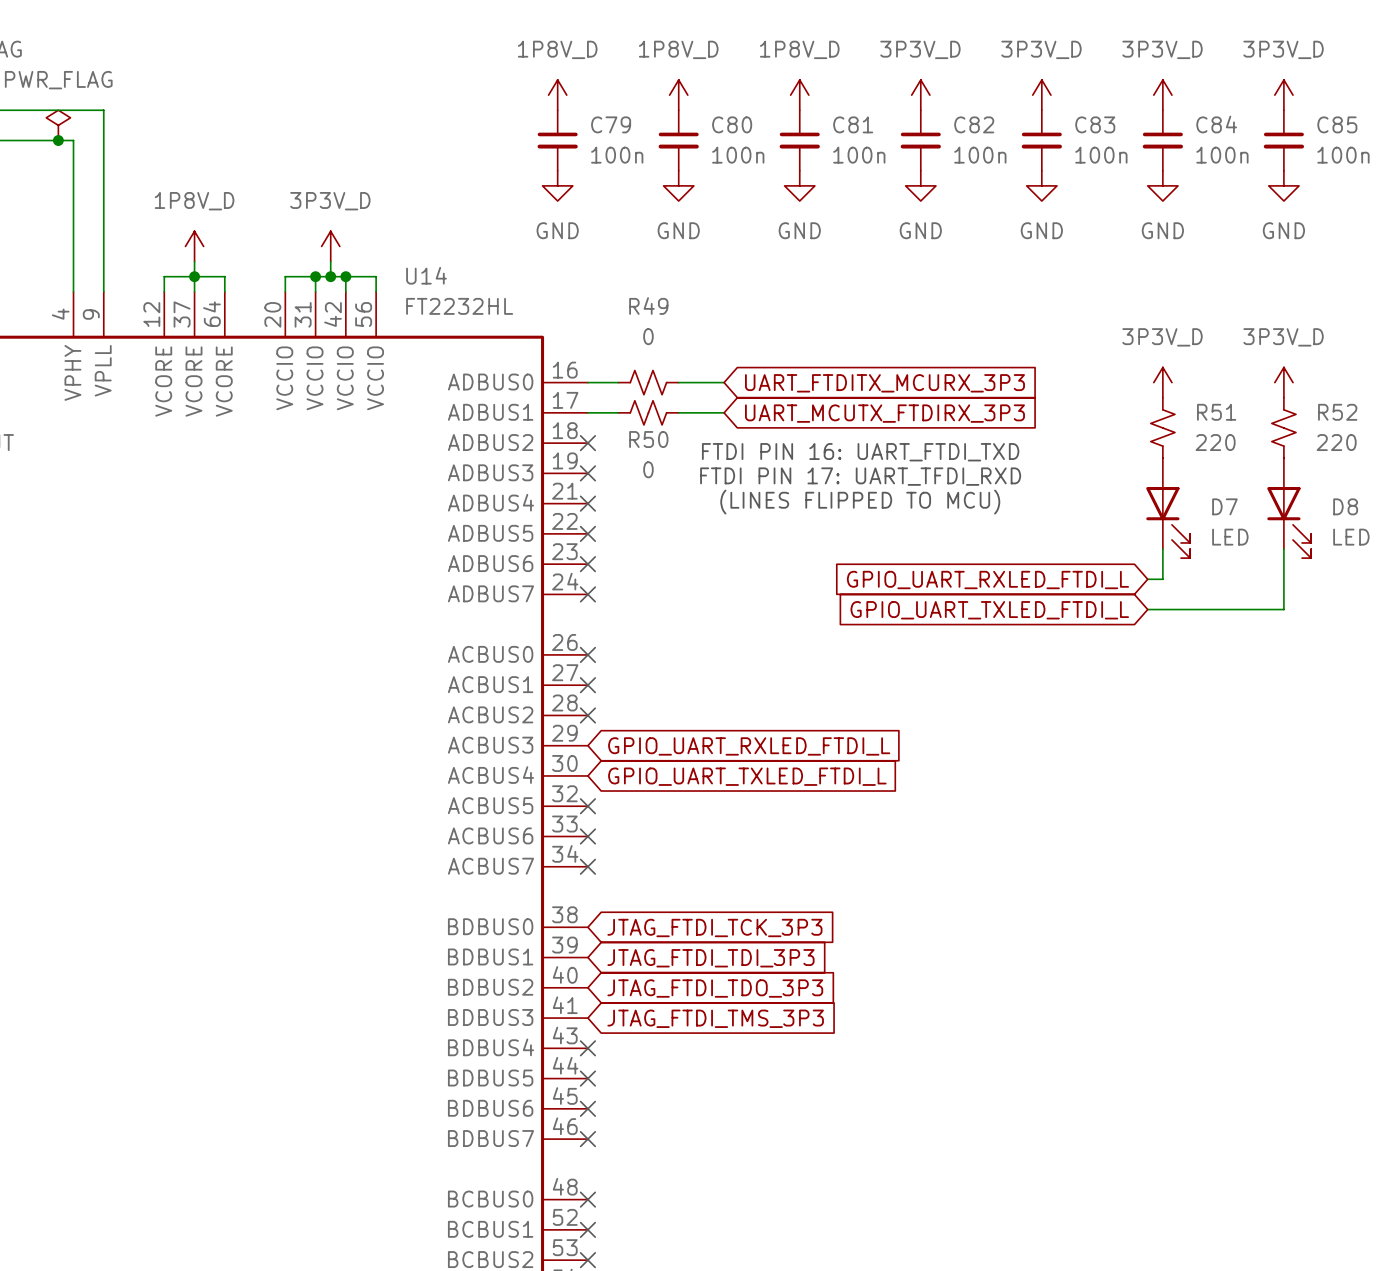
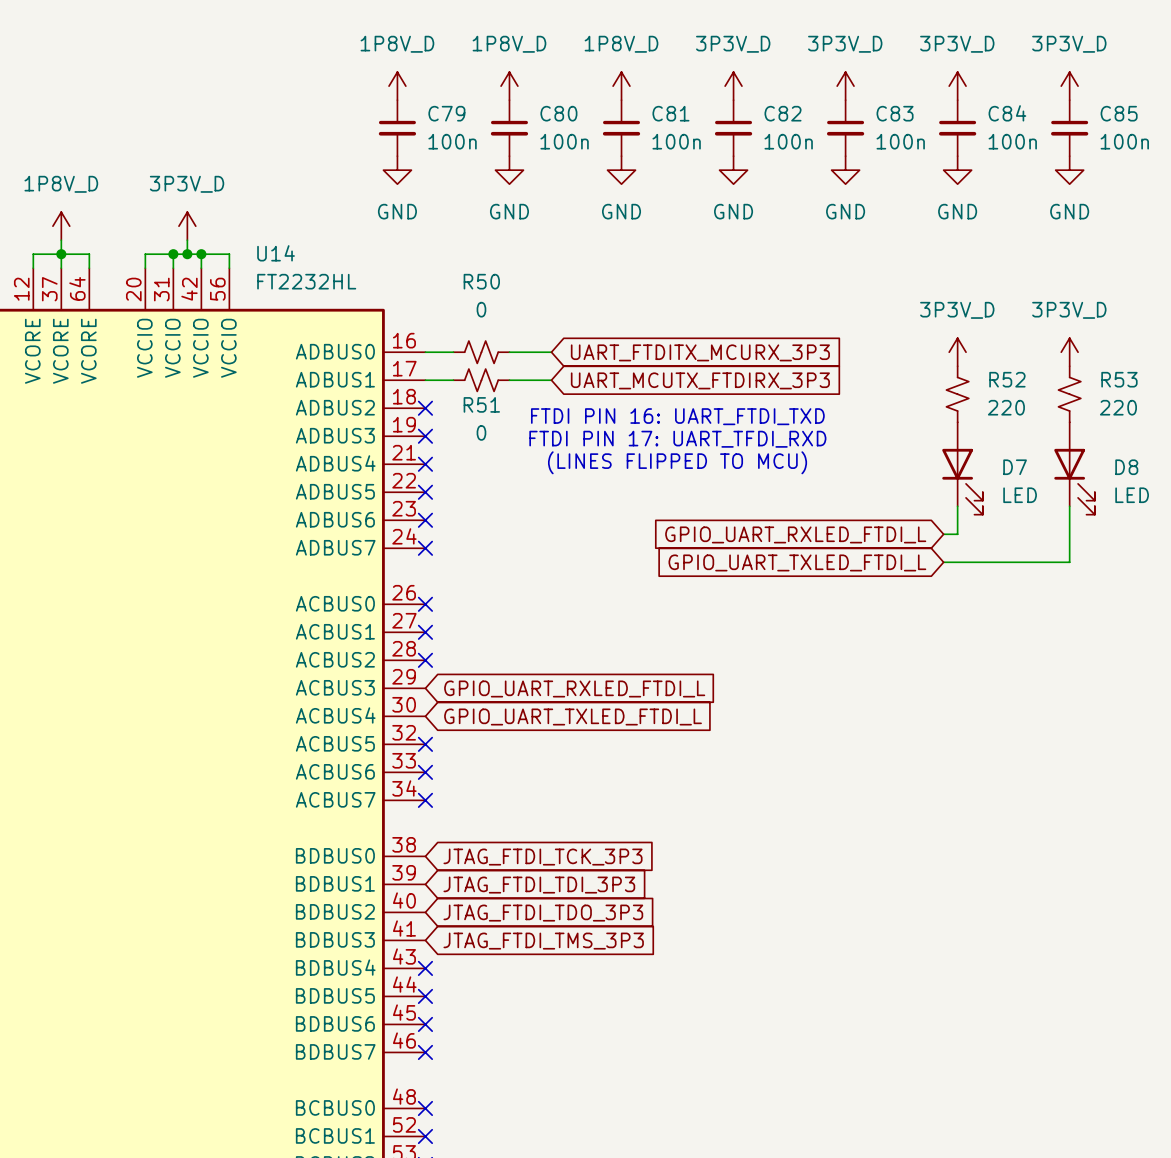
R49 name: R49 (648, 306) -> R50 (481, 281)
R51 name: R51 (1216, 412) -> R52 (1007, 379)
R52 name: R52 (1337, 412) -> R53 (1119, 379)
R50 name: R50 (648, 439) -> R51 (481, 404)

